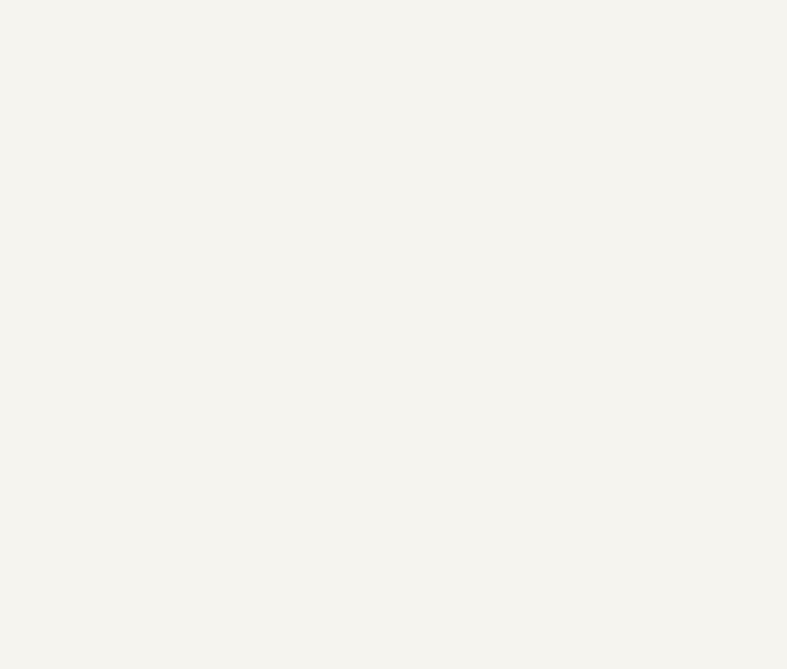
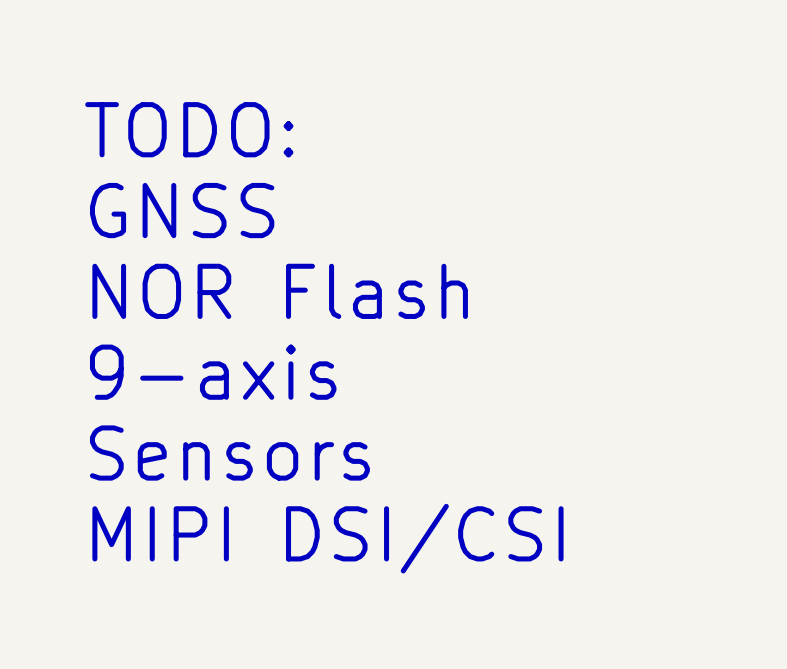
text: none -> TODO: (189, 129)
text: none -> GNSS (182, 210)
text: none -> NOR Flash (280, 291)
text: none -> 9-axis (213, 372)
text: none -> Sensors (229, 453)
text: none -> MIPI DSI/CSI (327, 538)

